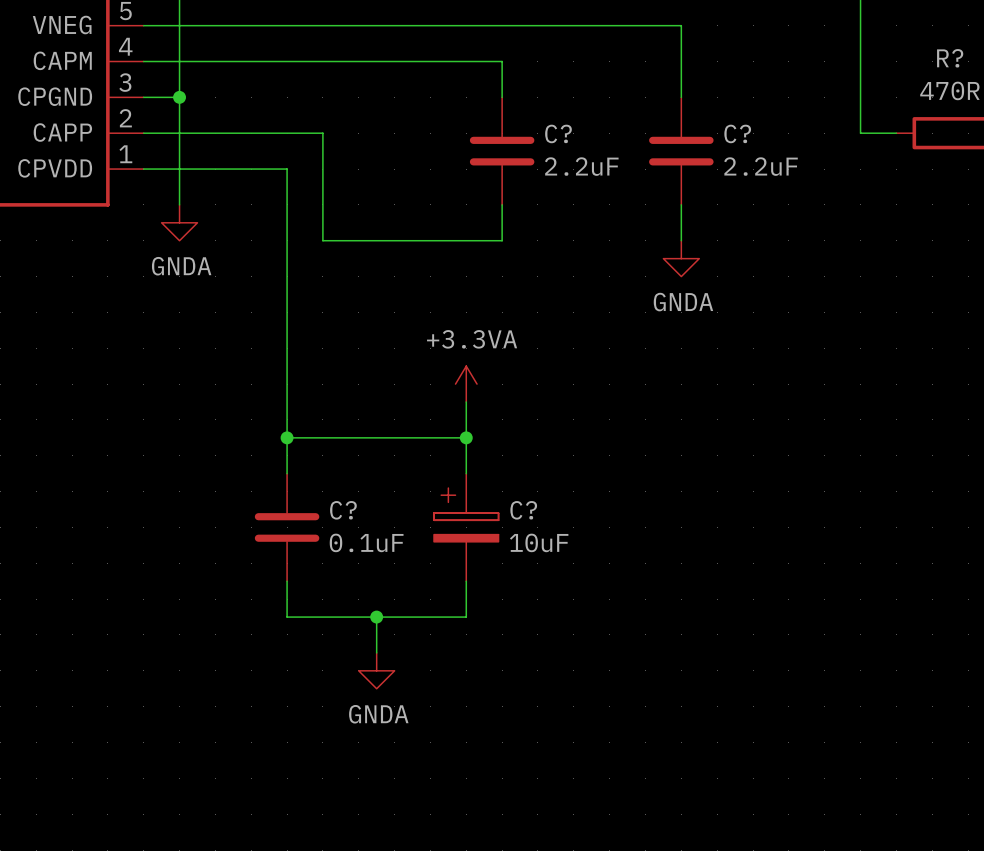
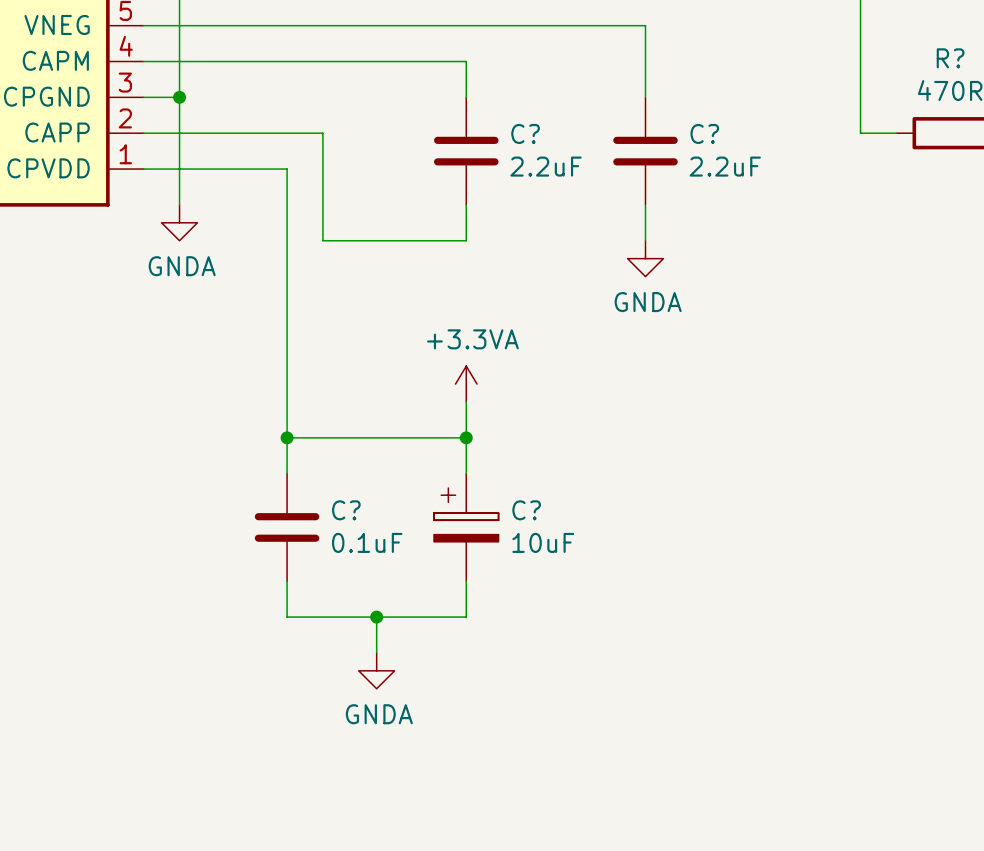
wire: (645, 25) (681, 25) (681, 97) -> (645, 25) (645, 97)
wire: (466, 61) (502, 61) (502, 97) -> (466, 61) (466, 97)
C? position: (502, 151) -> (466, 151)
C? position: (681, 151) -> (645, 151)
wire: (502, 204) (502, 240) (466, 240) -> (466, 204) (466, 240)
wire: (681, 204) (681, 240) -> (645, 204) (645, 240)
power symbol position: GNDA (681, 258) -> GNDA (645, 258)

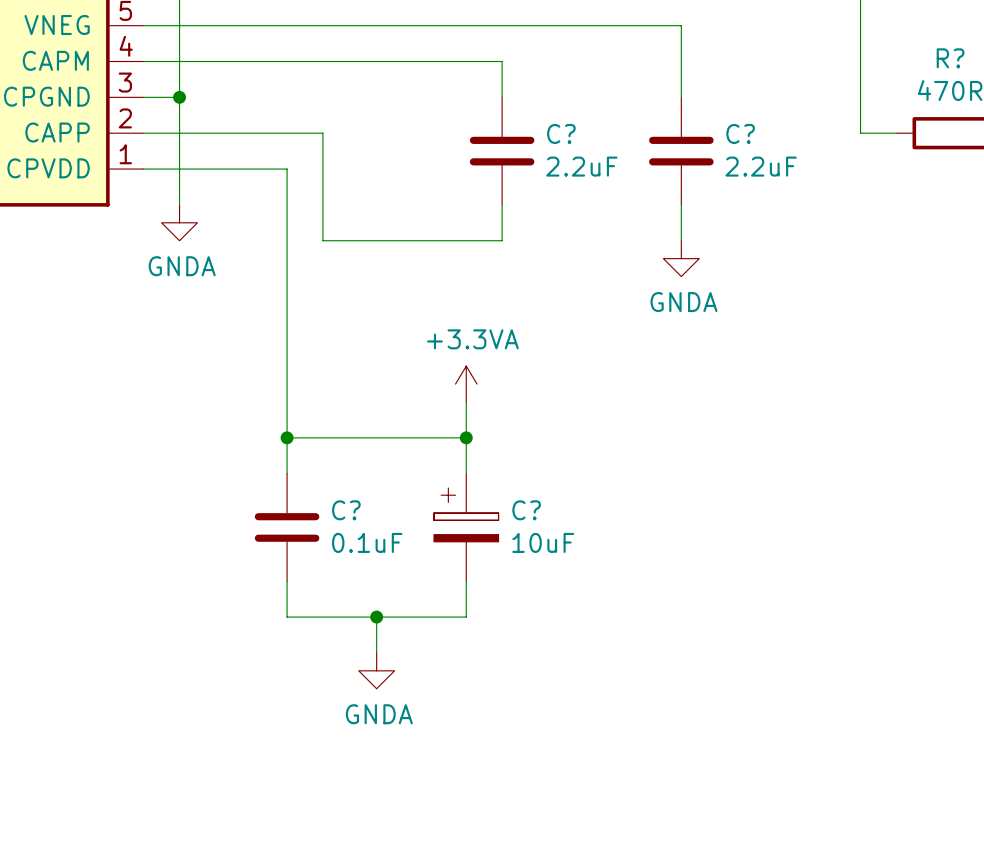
wire: (645, 25) (645, 97) -> (645, 25) (681, 25) (681, 97)
wire: (466, 61) (466, 97) -> (466, 61) (502, 61) (502, 97)
C? position: (466, 151) -> (502, 151)
C? position: (645, 151) -> (681, 151)
wire: (466, 204) (466, 240) -> (502, 204) (502, 240) (466, 240)
wire: (645, 204) (645, 240) -> (681, 204) (681, 240)
power symbol position: GNDA (645, 258) -> GNDA (681, 258)

